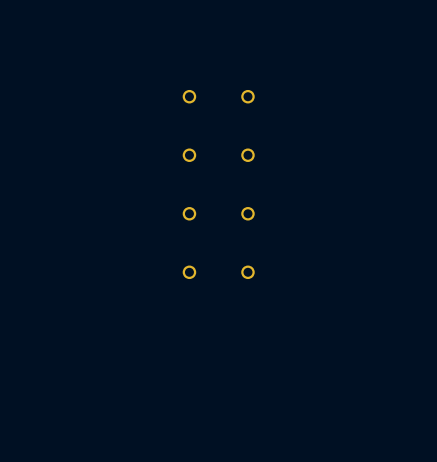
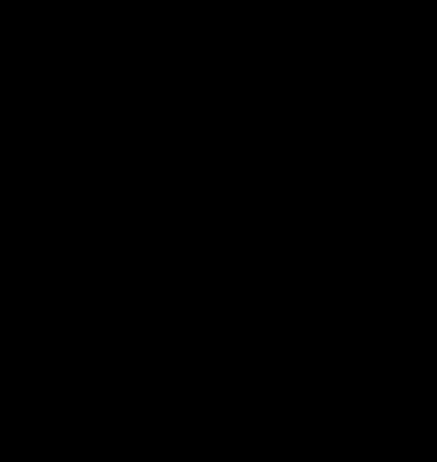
part: (218, 184) -> none

